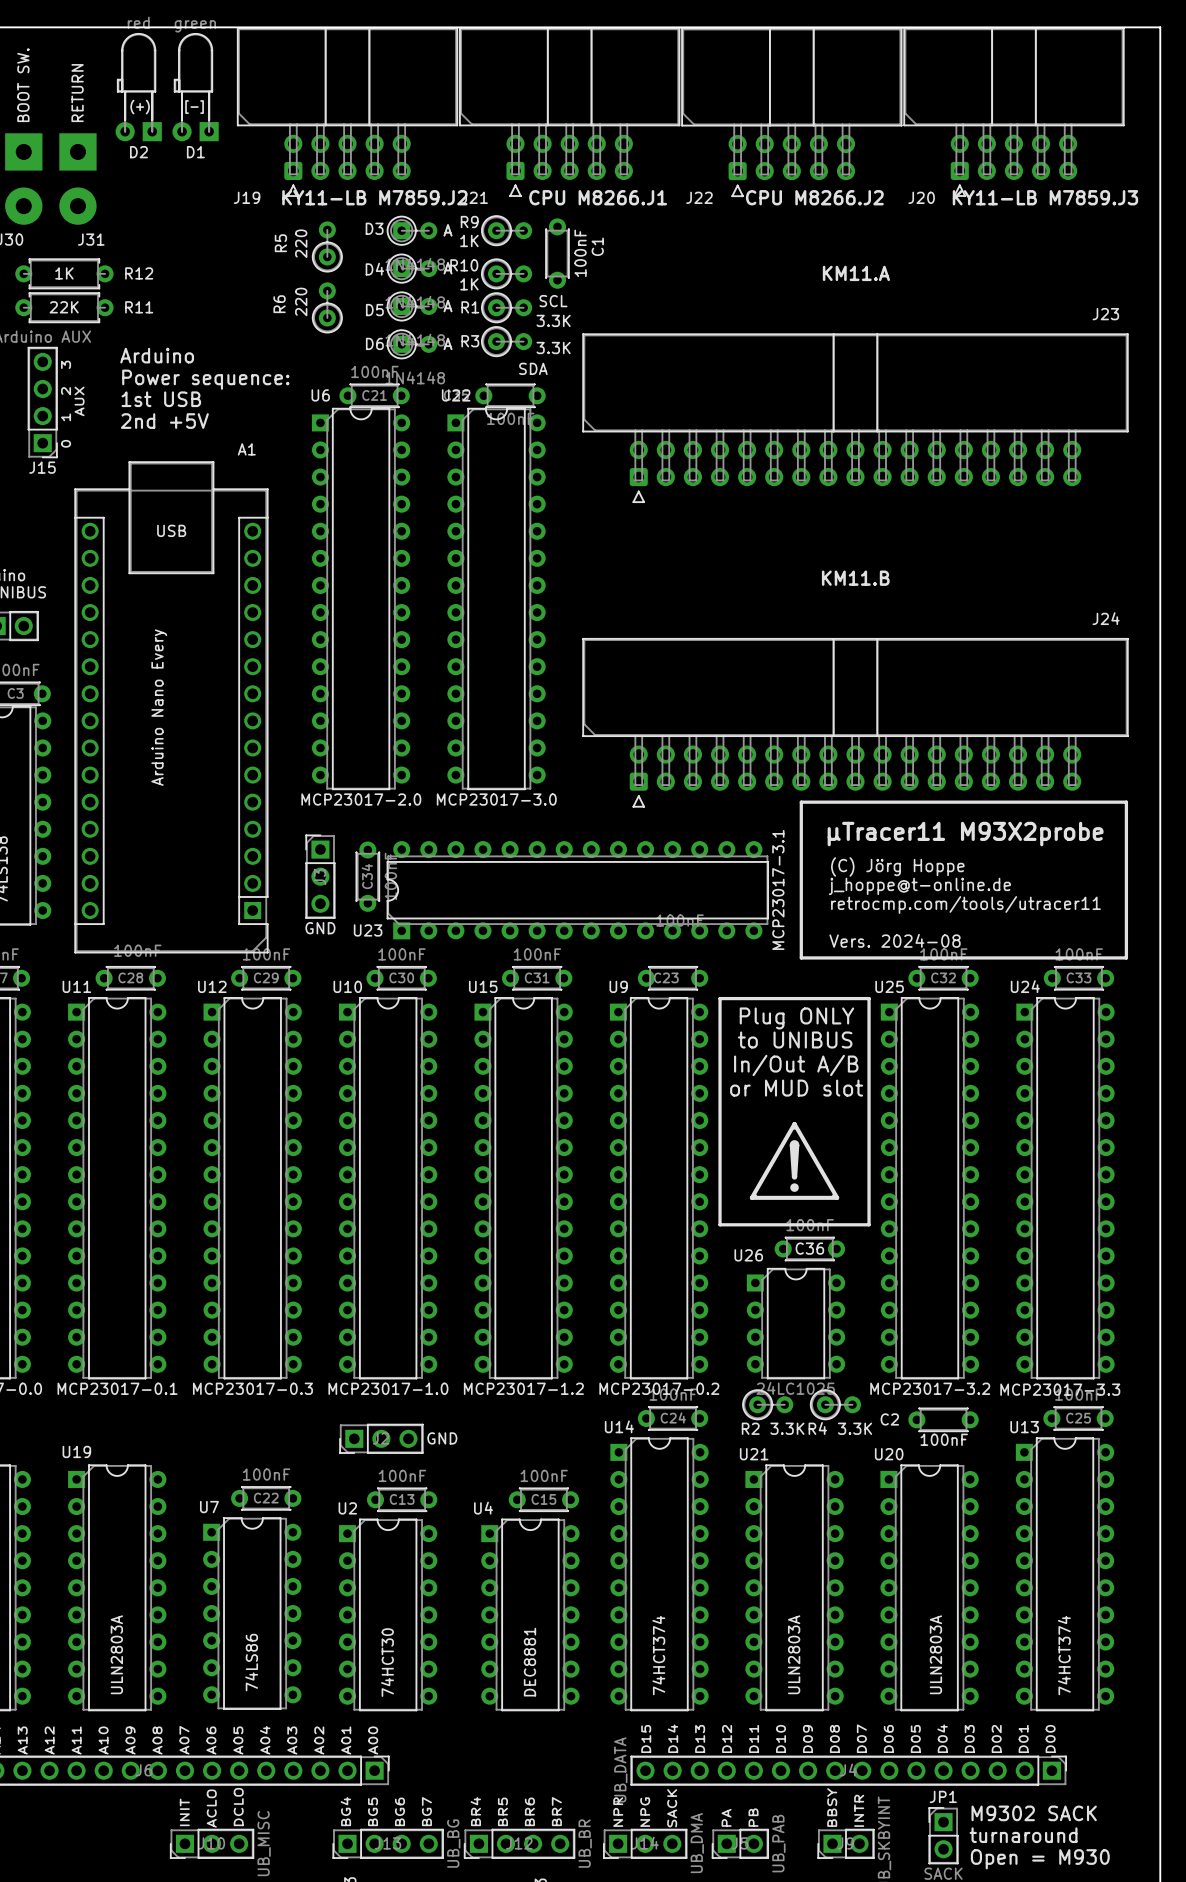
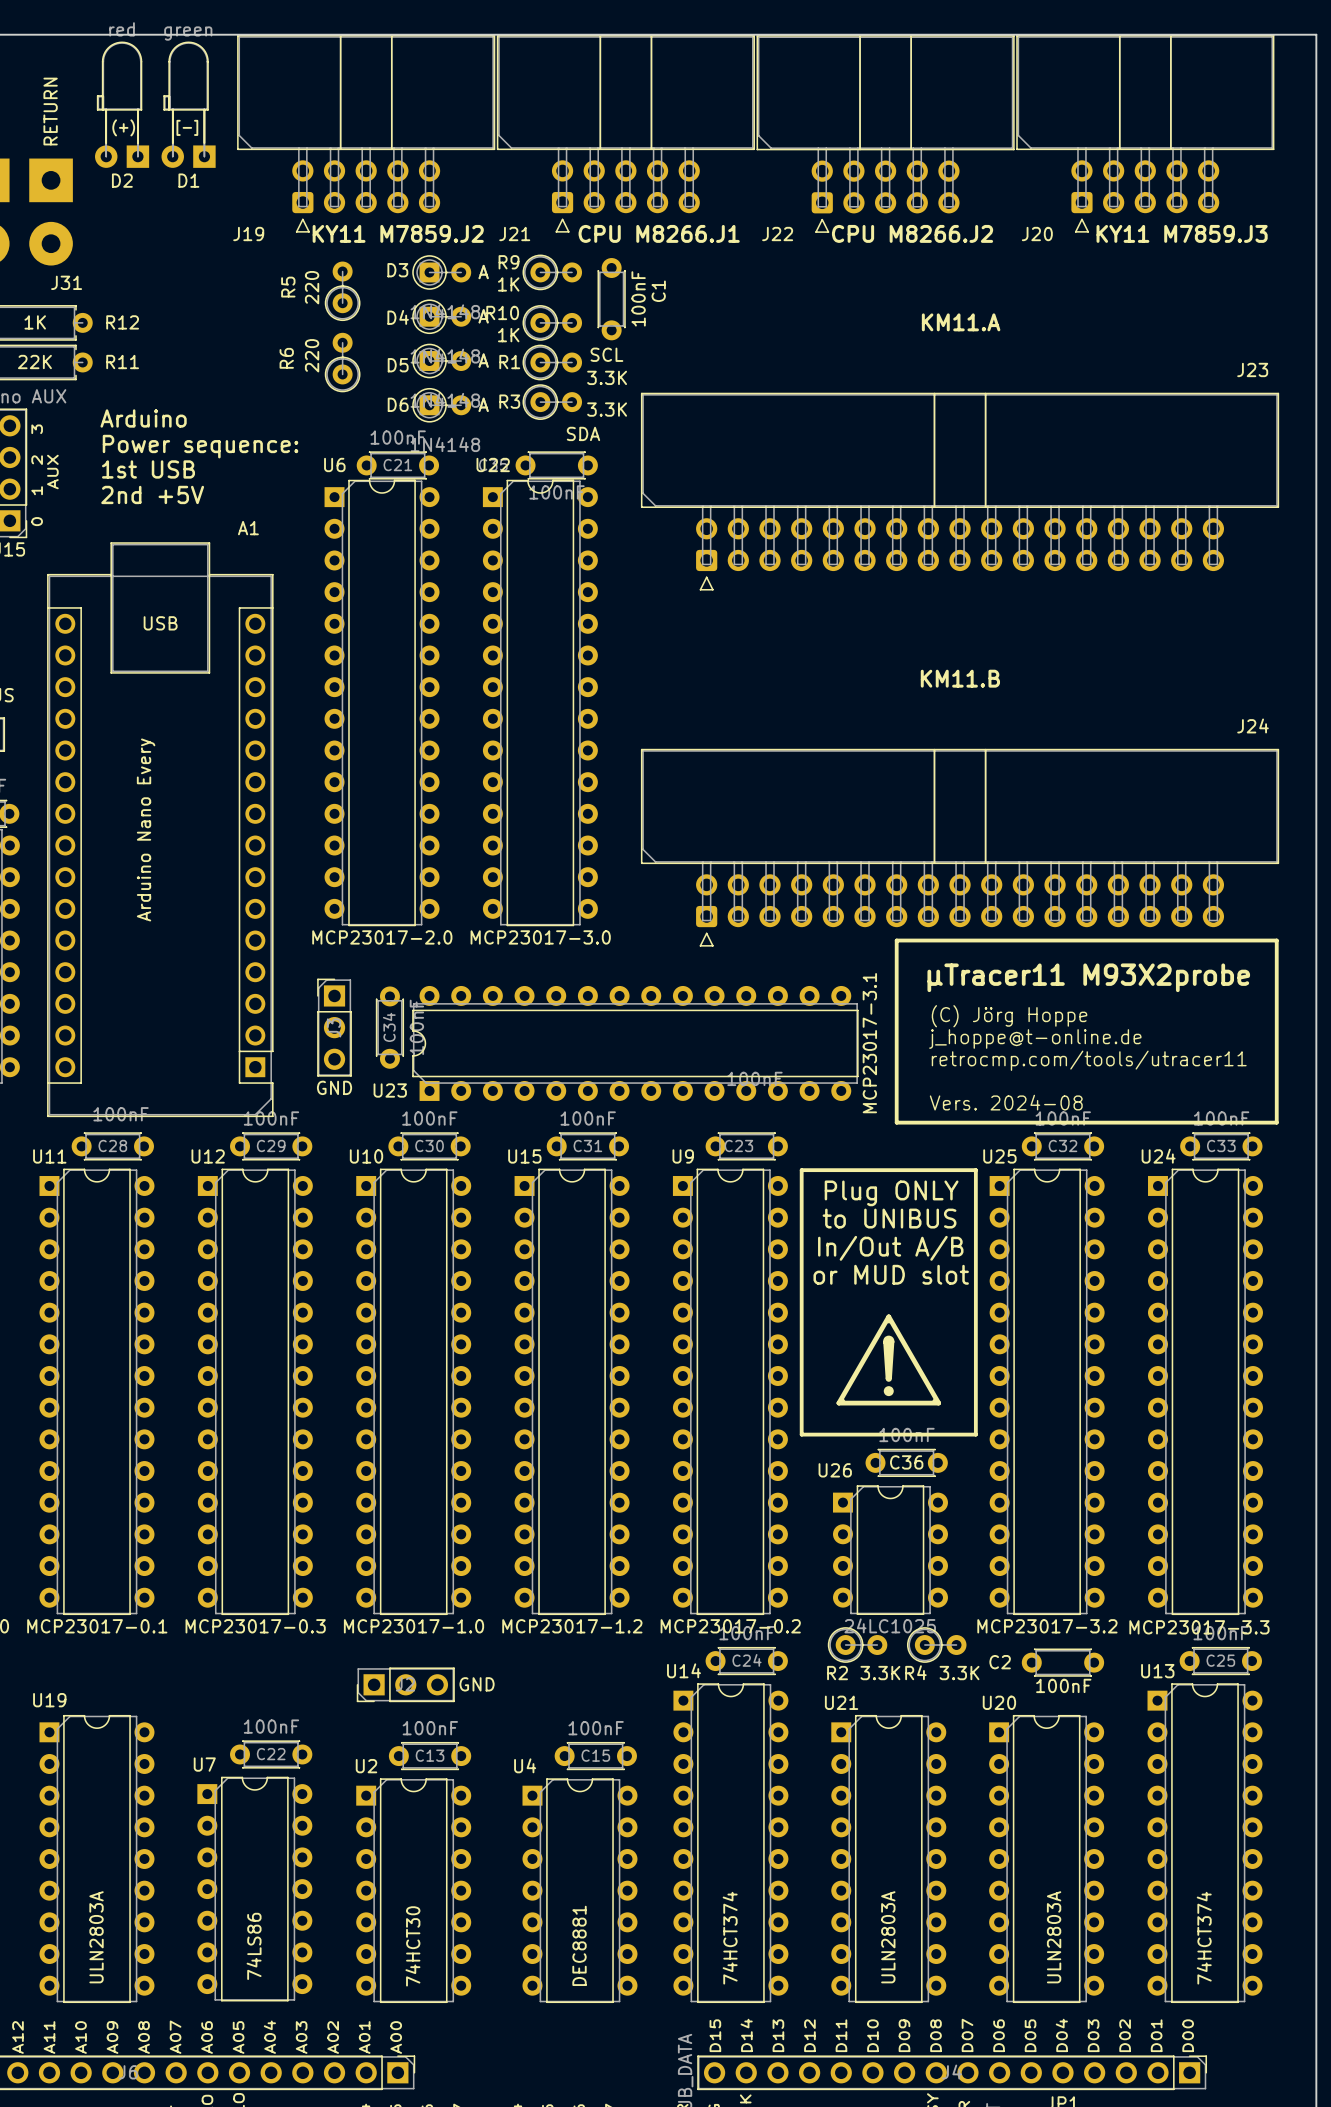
J19 value: KY11-LB M7859.J2 (374, 197) -> KY11 M7859.J2 (398, 233)
J20 value: KY11-LB M7859.J3 (1045, 197) -> KY11 M7859.J3 (1182, 233)

